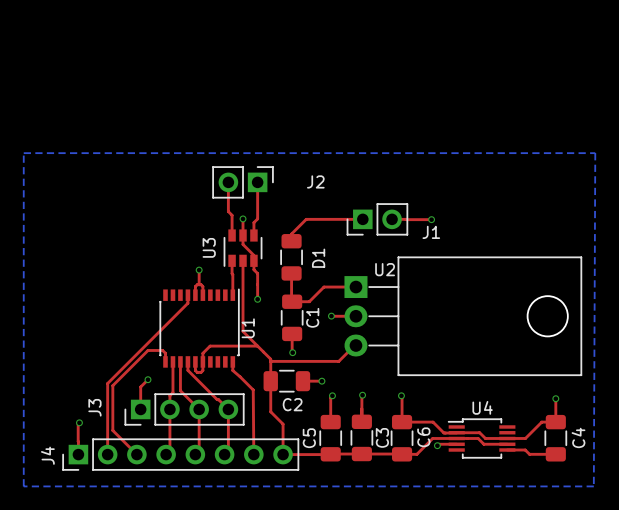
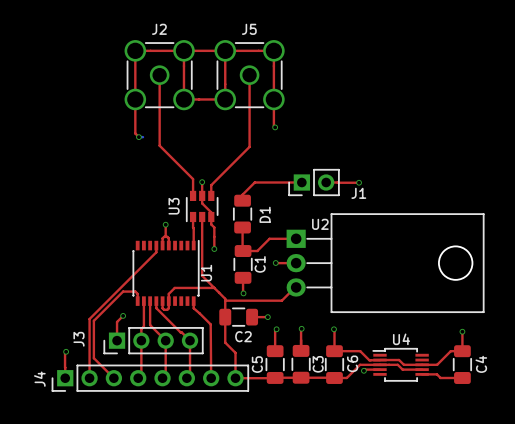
top track: none -> (183, 50) (183, 99) (225, 99) (225, 50)
J5: none -> (249, 75)
bottom zone outline: (23, 153) (23, 486) (593, 486) (595, 153) (23, 153) -> none
top track: none -> (275, 127) (273, 50) (135, 50) (135, 133) (138, 137)
via: none -> (275, 127)
bottom track: none -> (138, 137) (143, 137)
via: none -> (138, 137)
J2 footprint: [212, 166, 274, 199] -> [124, 40, 195, 111]
J2 name position: J2 (315, 181) -> J2 (159, 29)
top track: (228, 182) (228, 211) -> (159, 75) (159, 145) (190, 176)
top track: (257, 182) (257, 218) -> (249, 75) (249, 146) (214, 182)

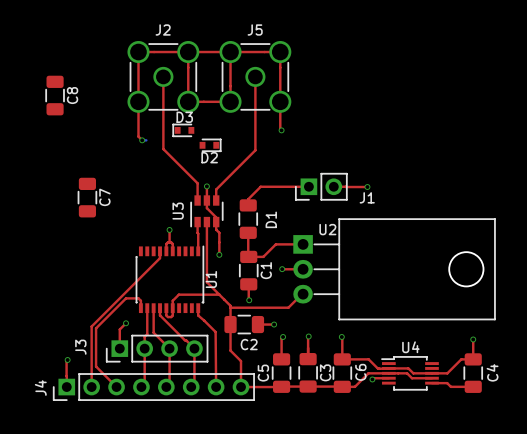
C8: none -> (55, 95)
D3: none -> (183, 130)
D2: none -> (210, 145)
C7: none -> (87, 197)

